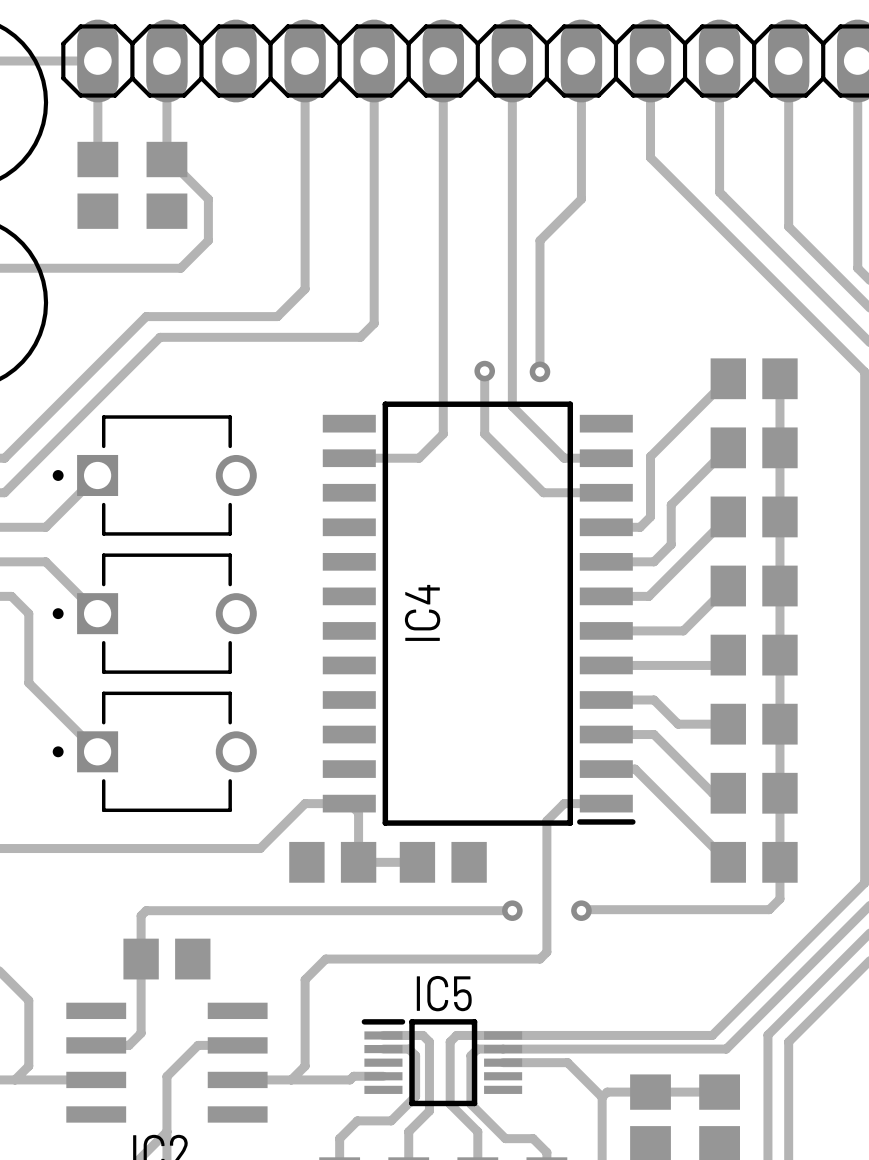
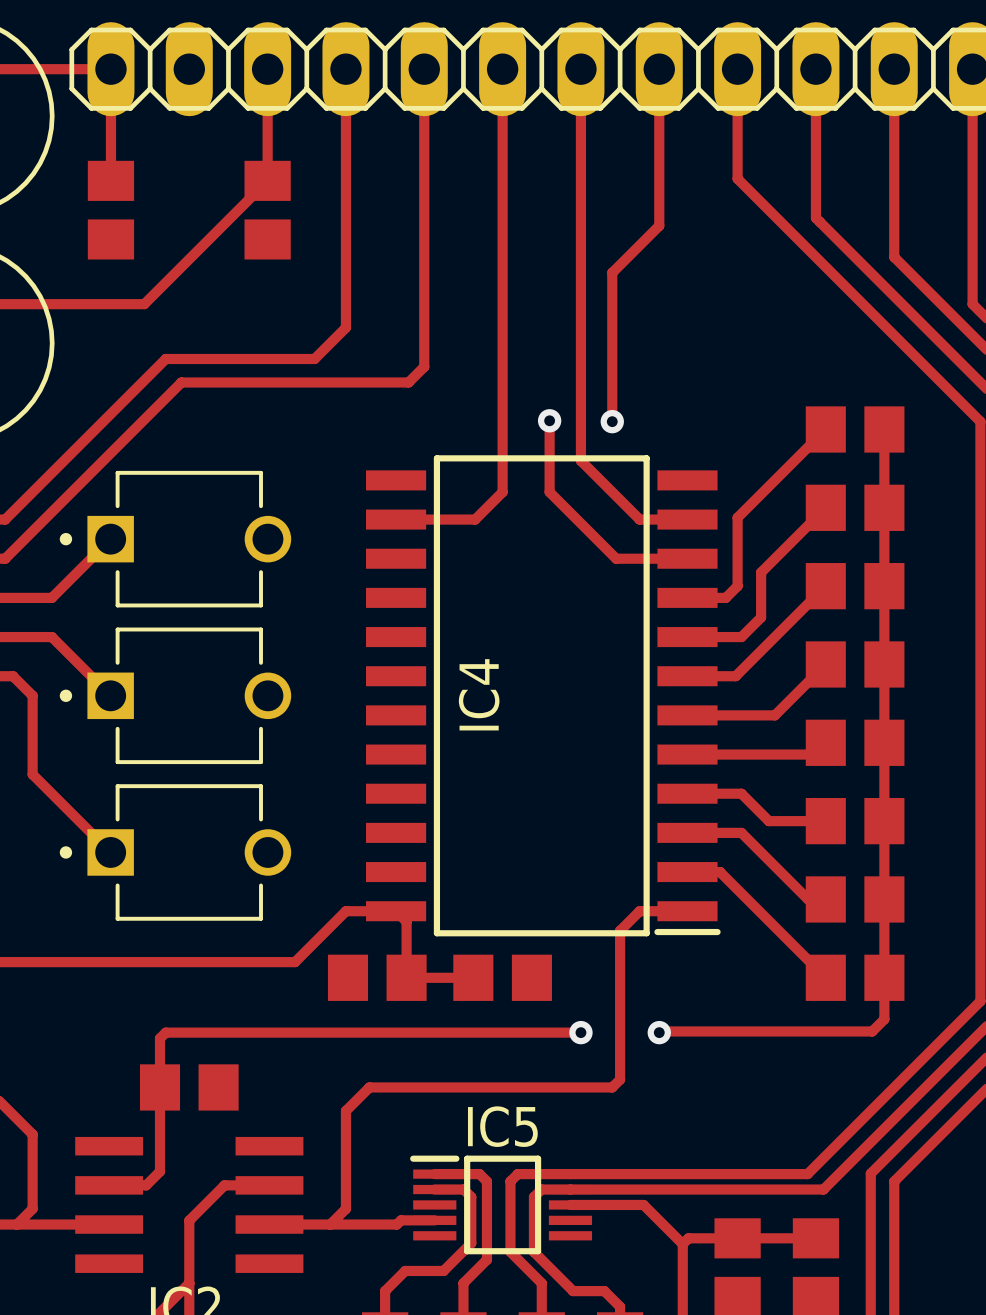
track: (166, 61) (166, 159) (208, 199) (208, 240) (180, 268) (127, 268) -> (267, 69) (267, 180) (144, 304)
part position: (166, 185) -> (267, 210)

